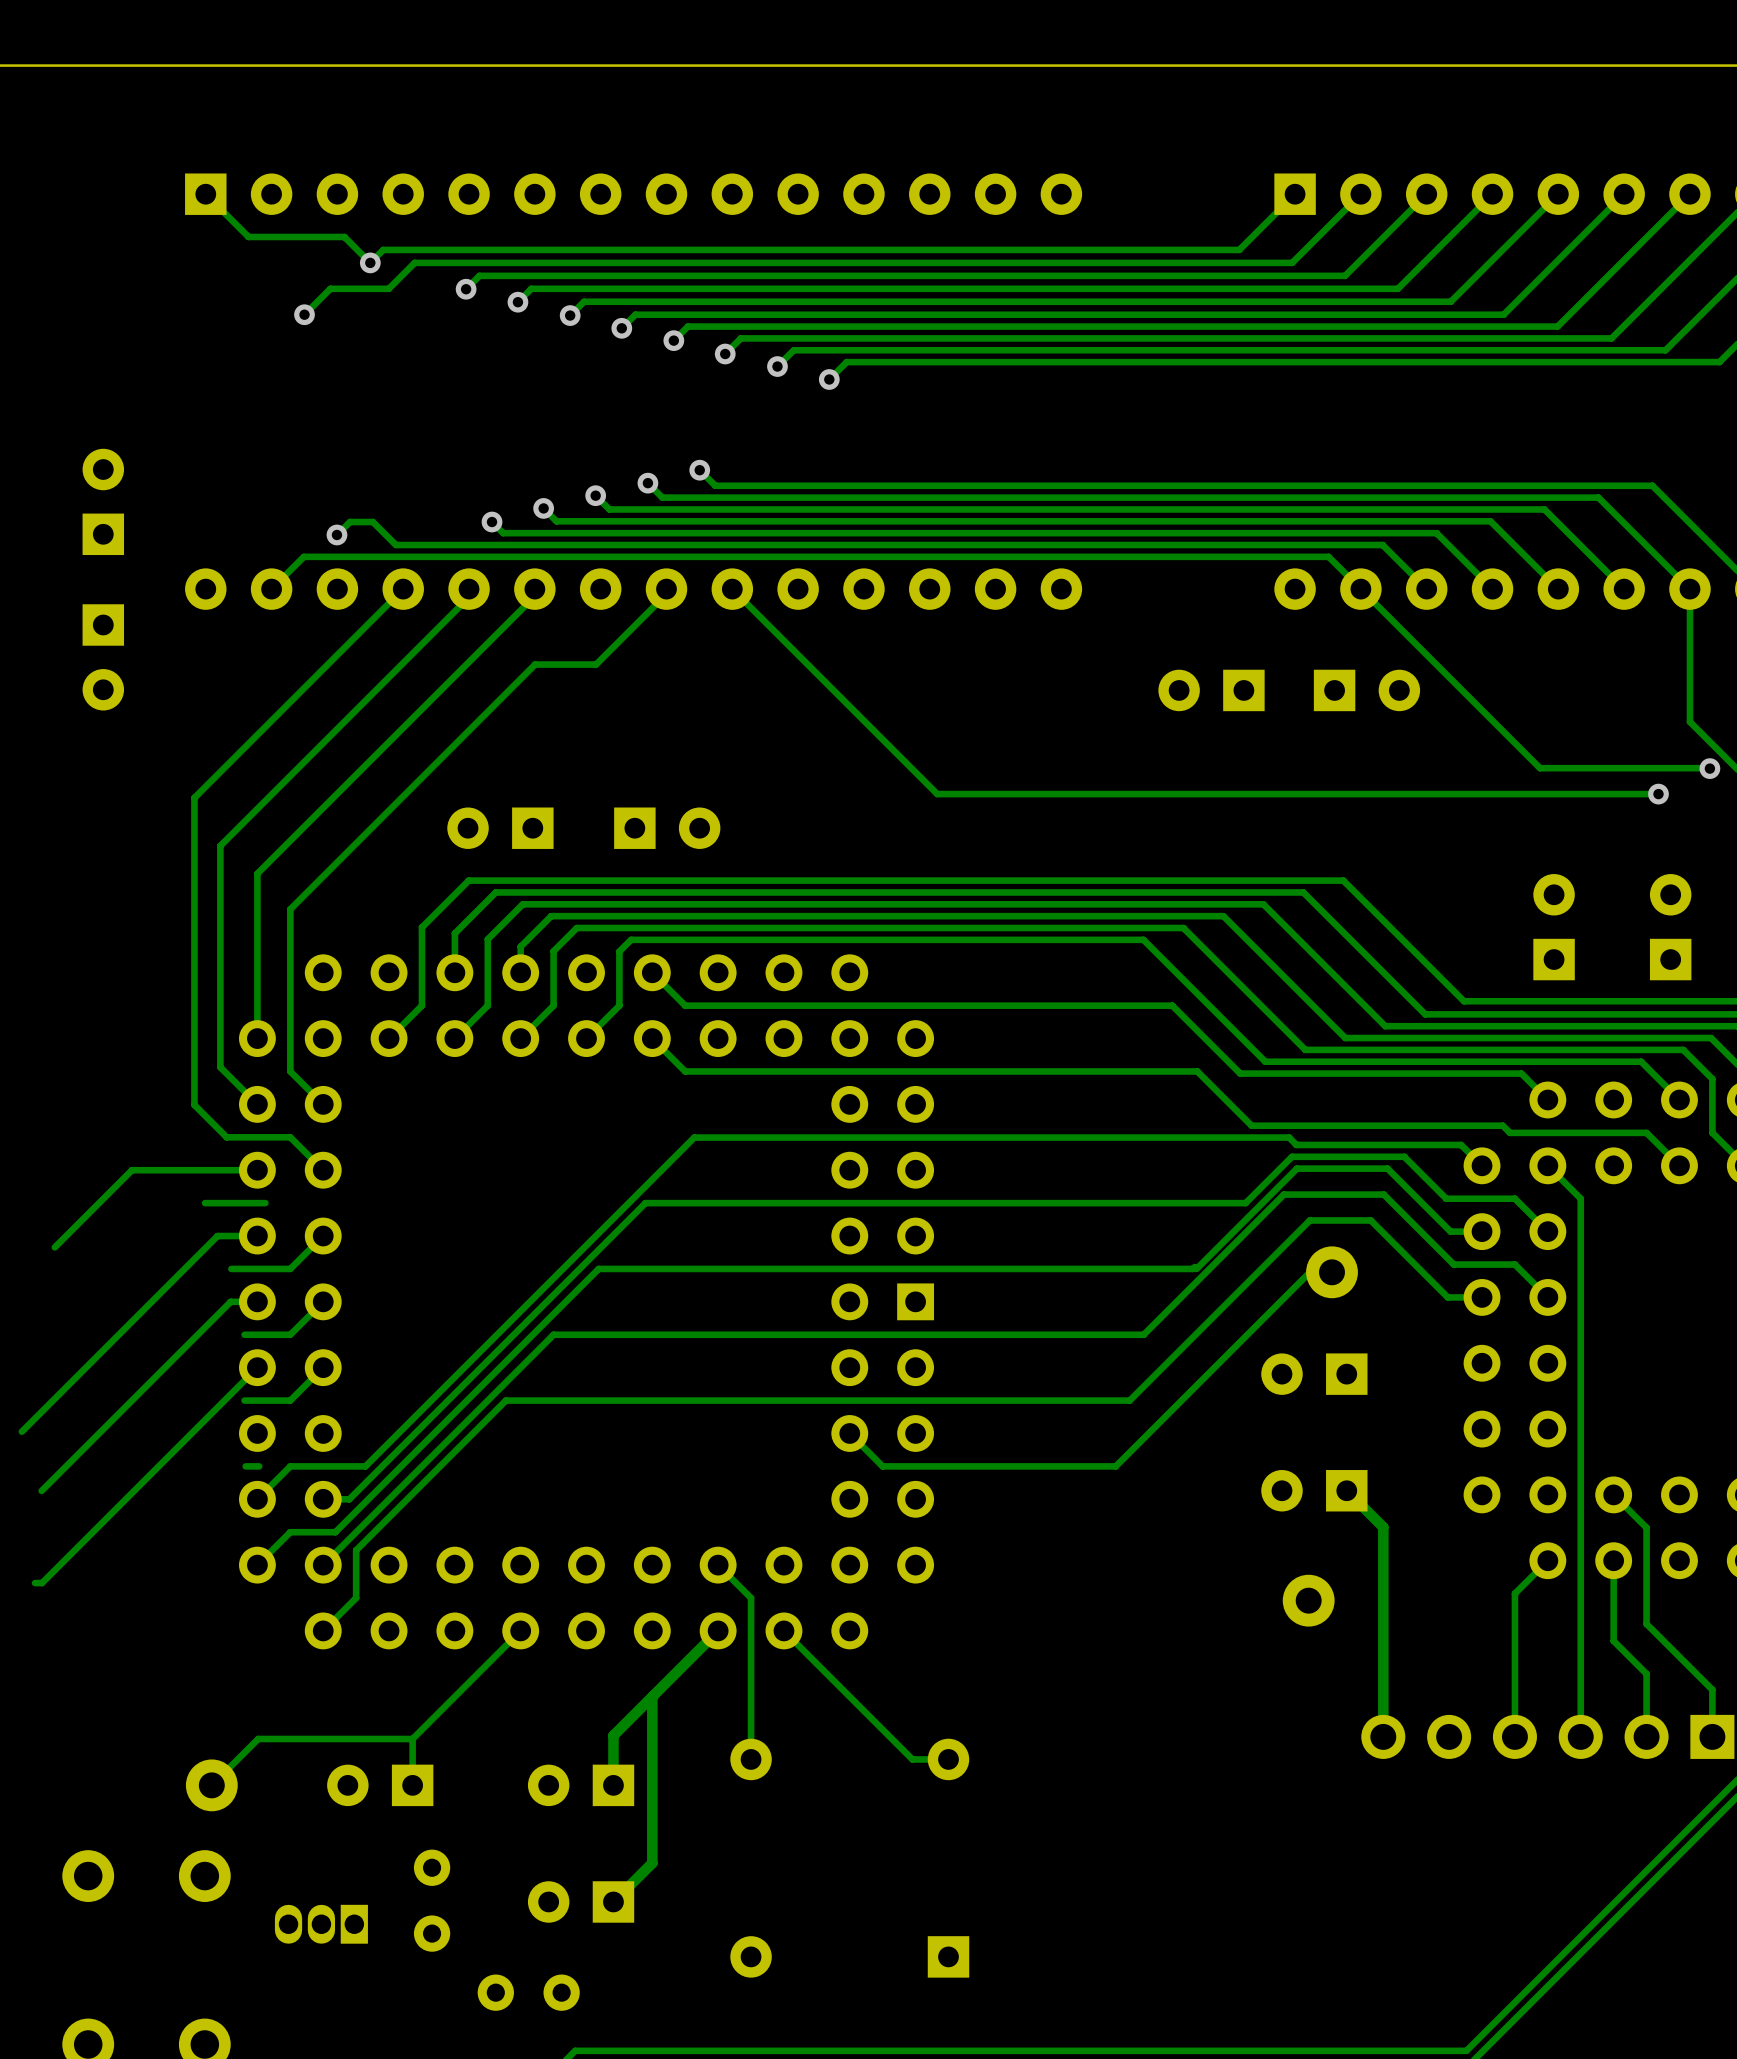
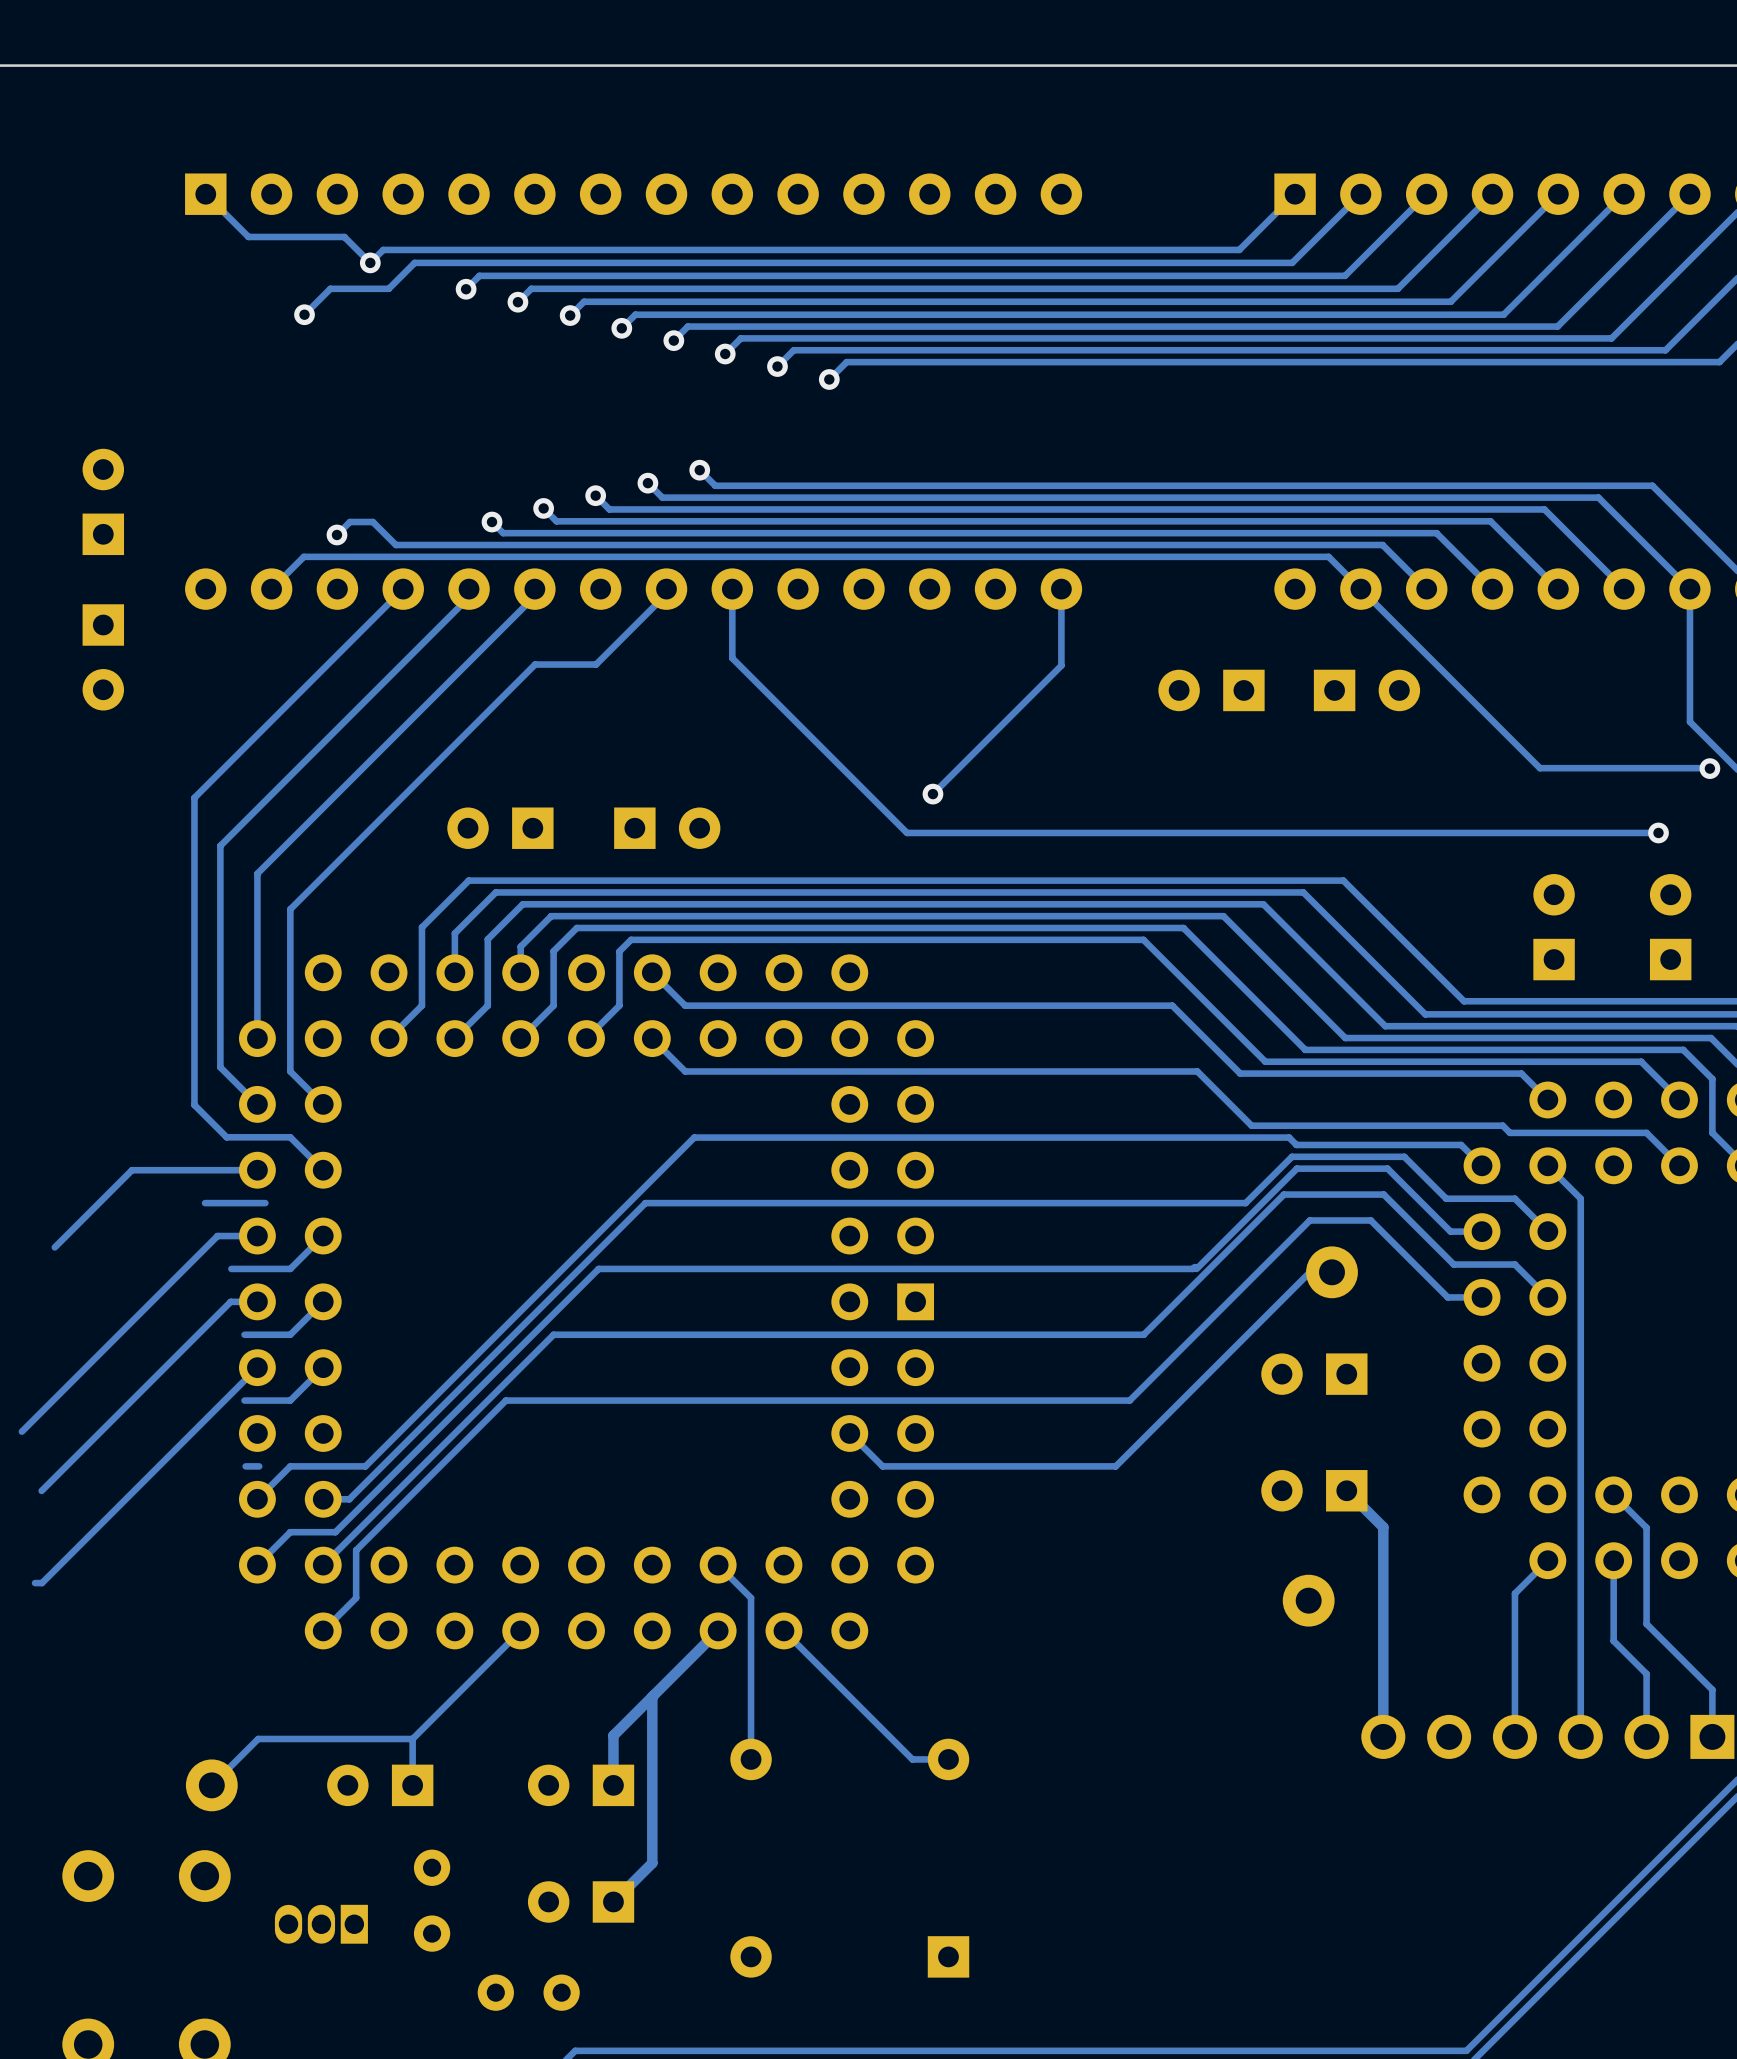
track: (732, 589) (937, 794) (1658, 794) -> (732, 589) (732, 658) (907, 832) (1658, 832)
track: none -> (1061, 589) (1061, 665) (932, 794)
via: none -> (932, 794)
via position: (1658, 794) -> (1658, 832)

